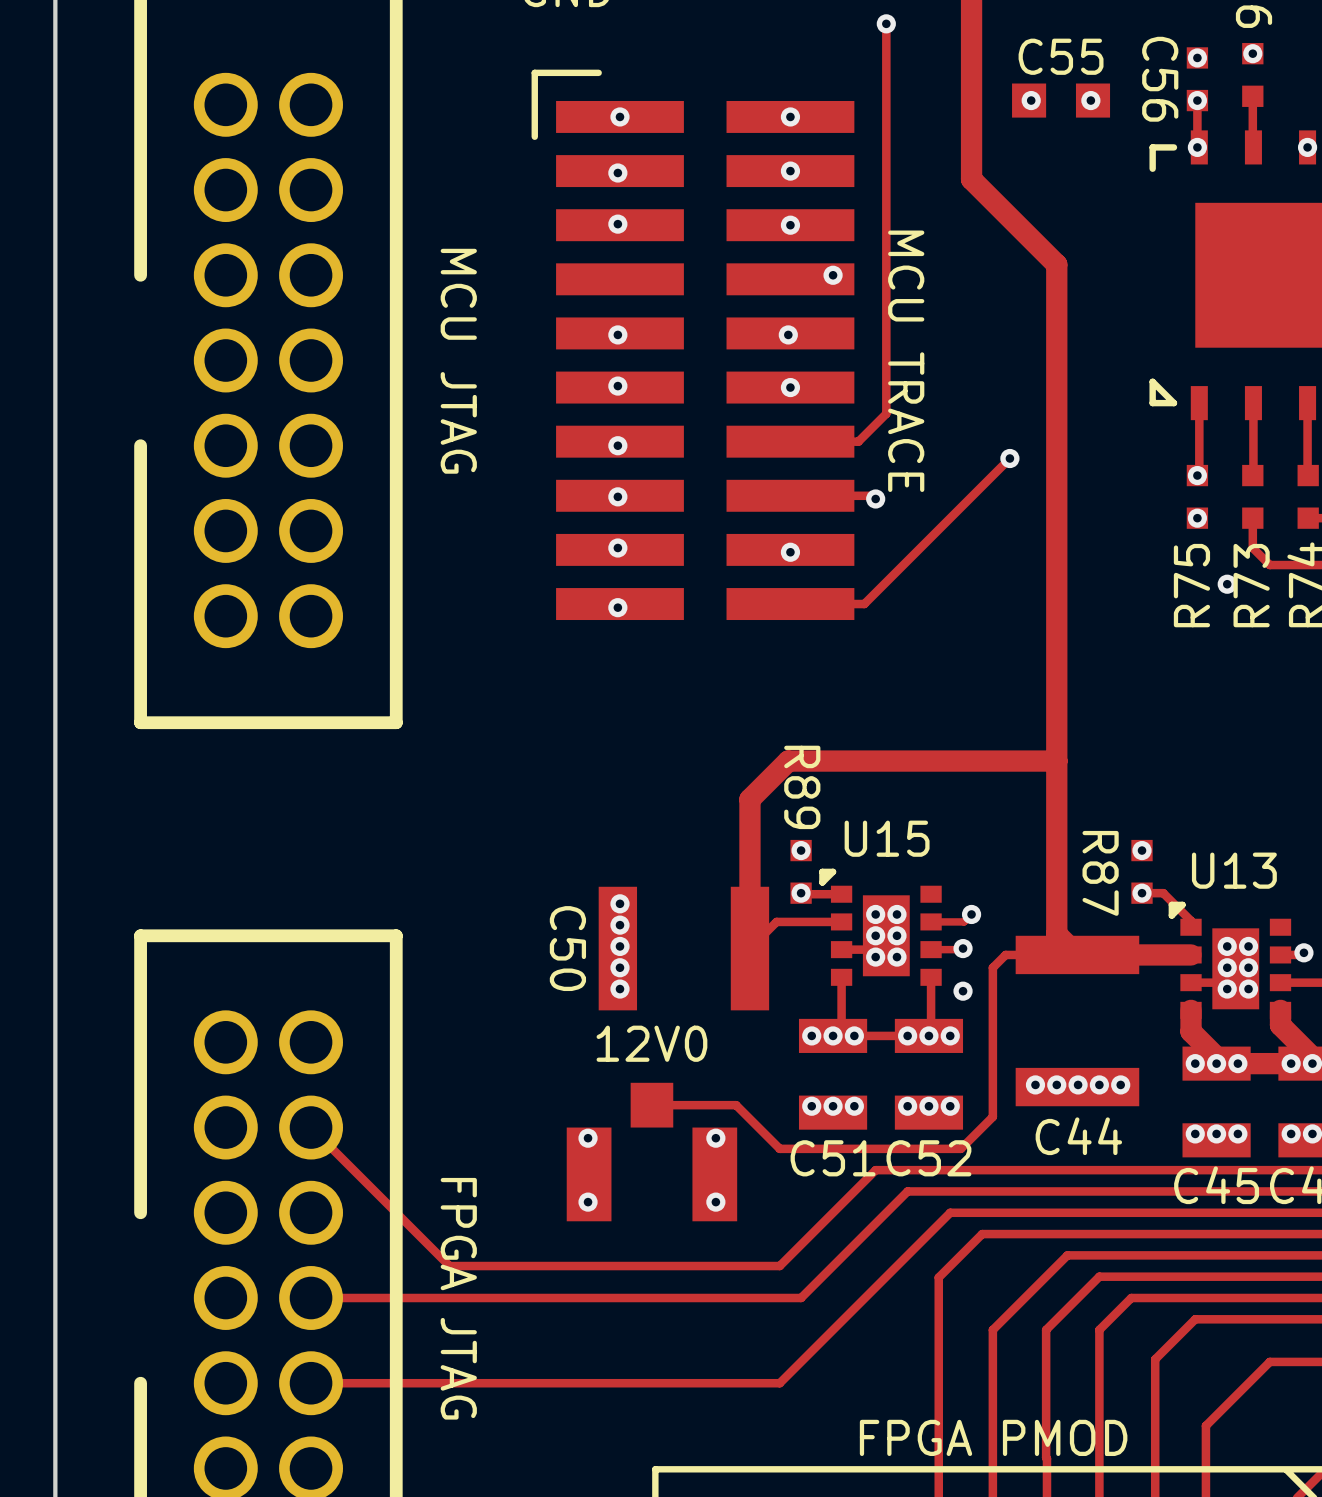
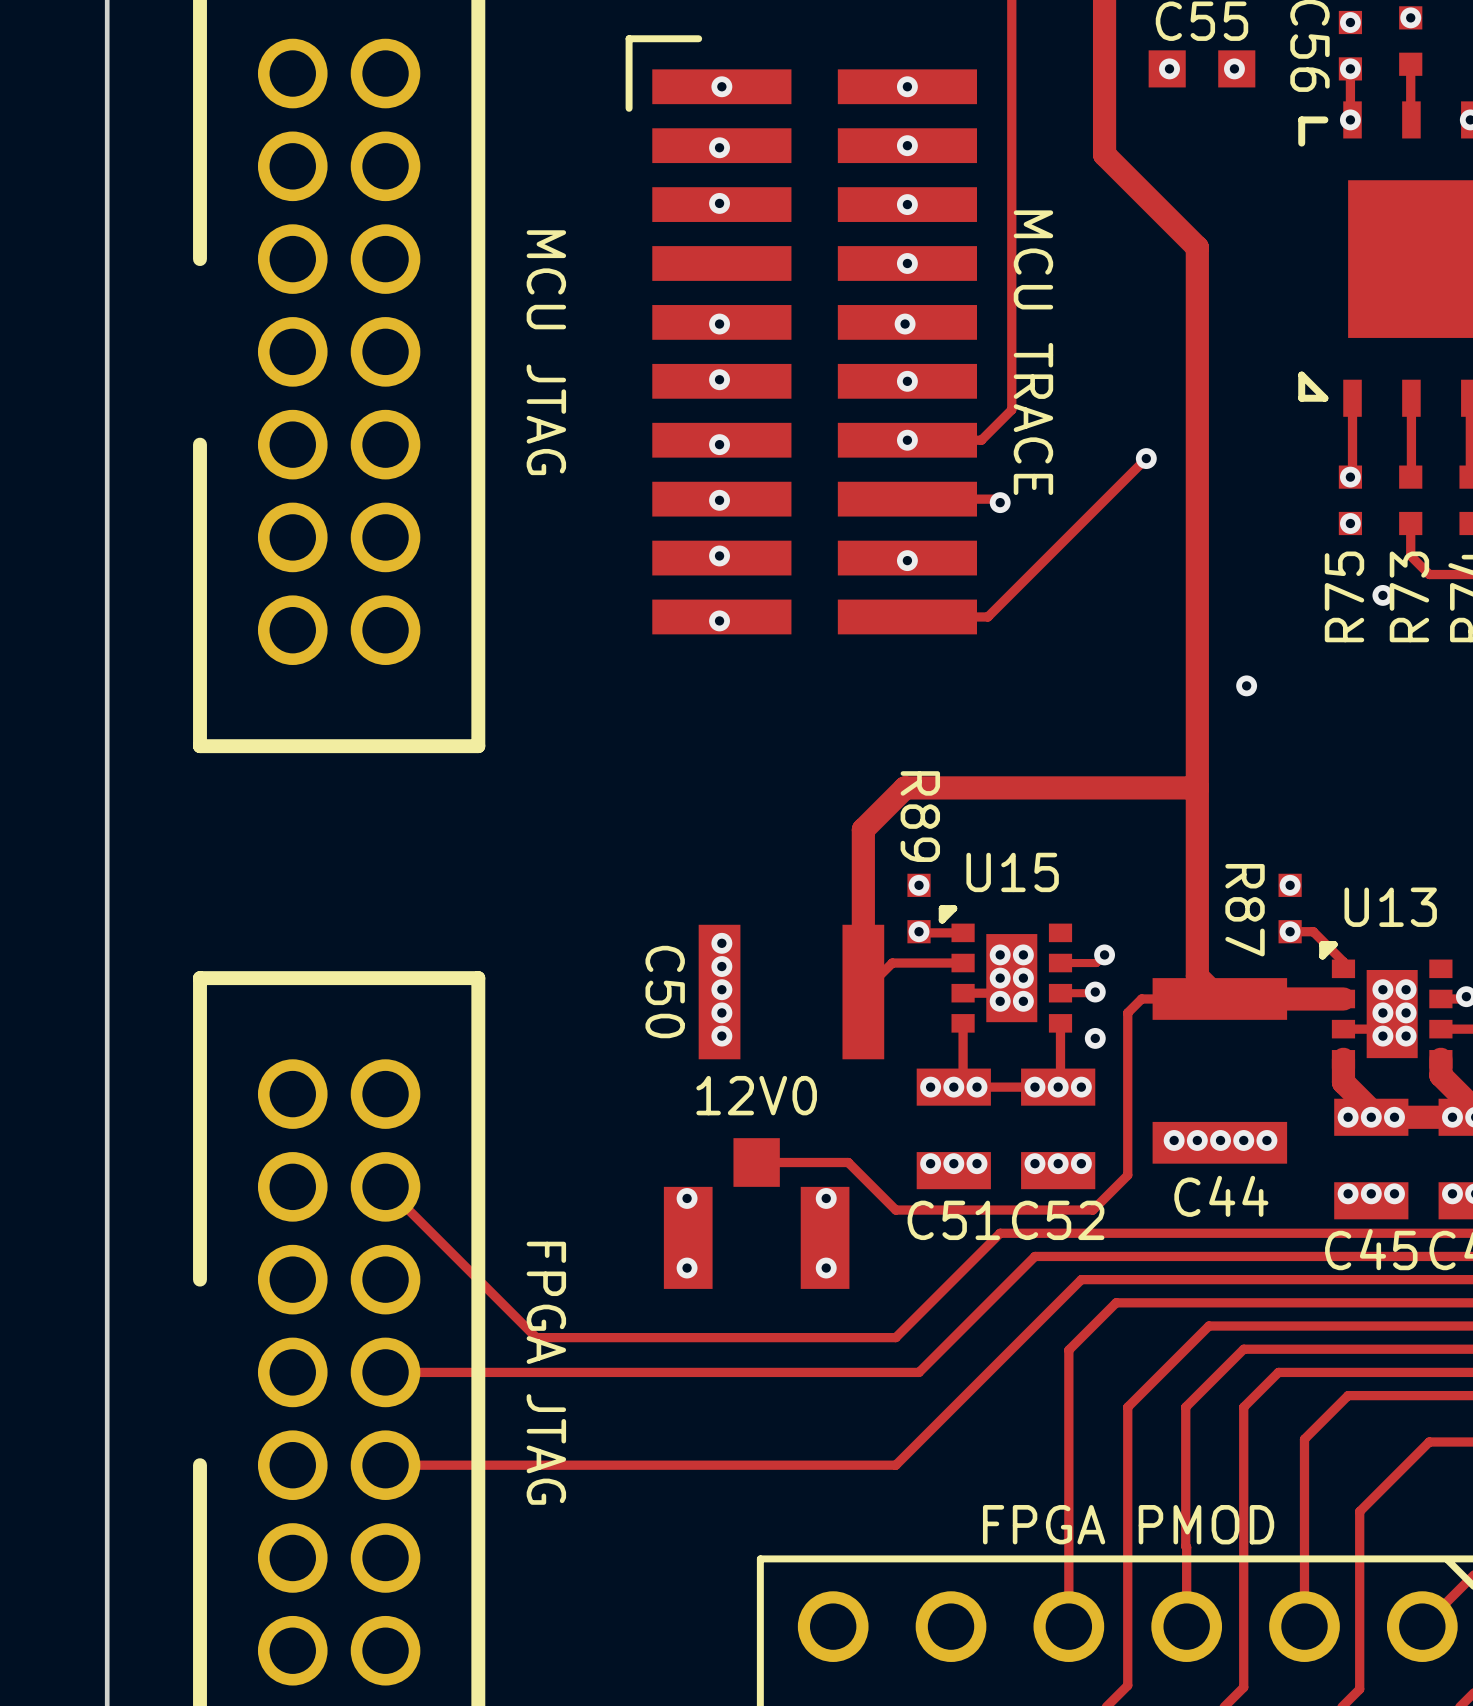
via position: (833, 275) -> (907, 263)
via: none -> (907, 440)
via: none -> (1246, 685)

